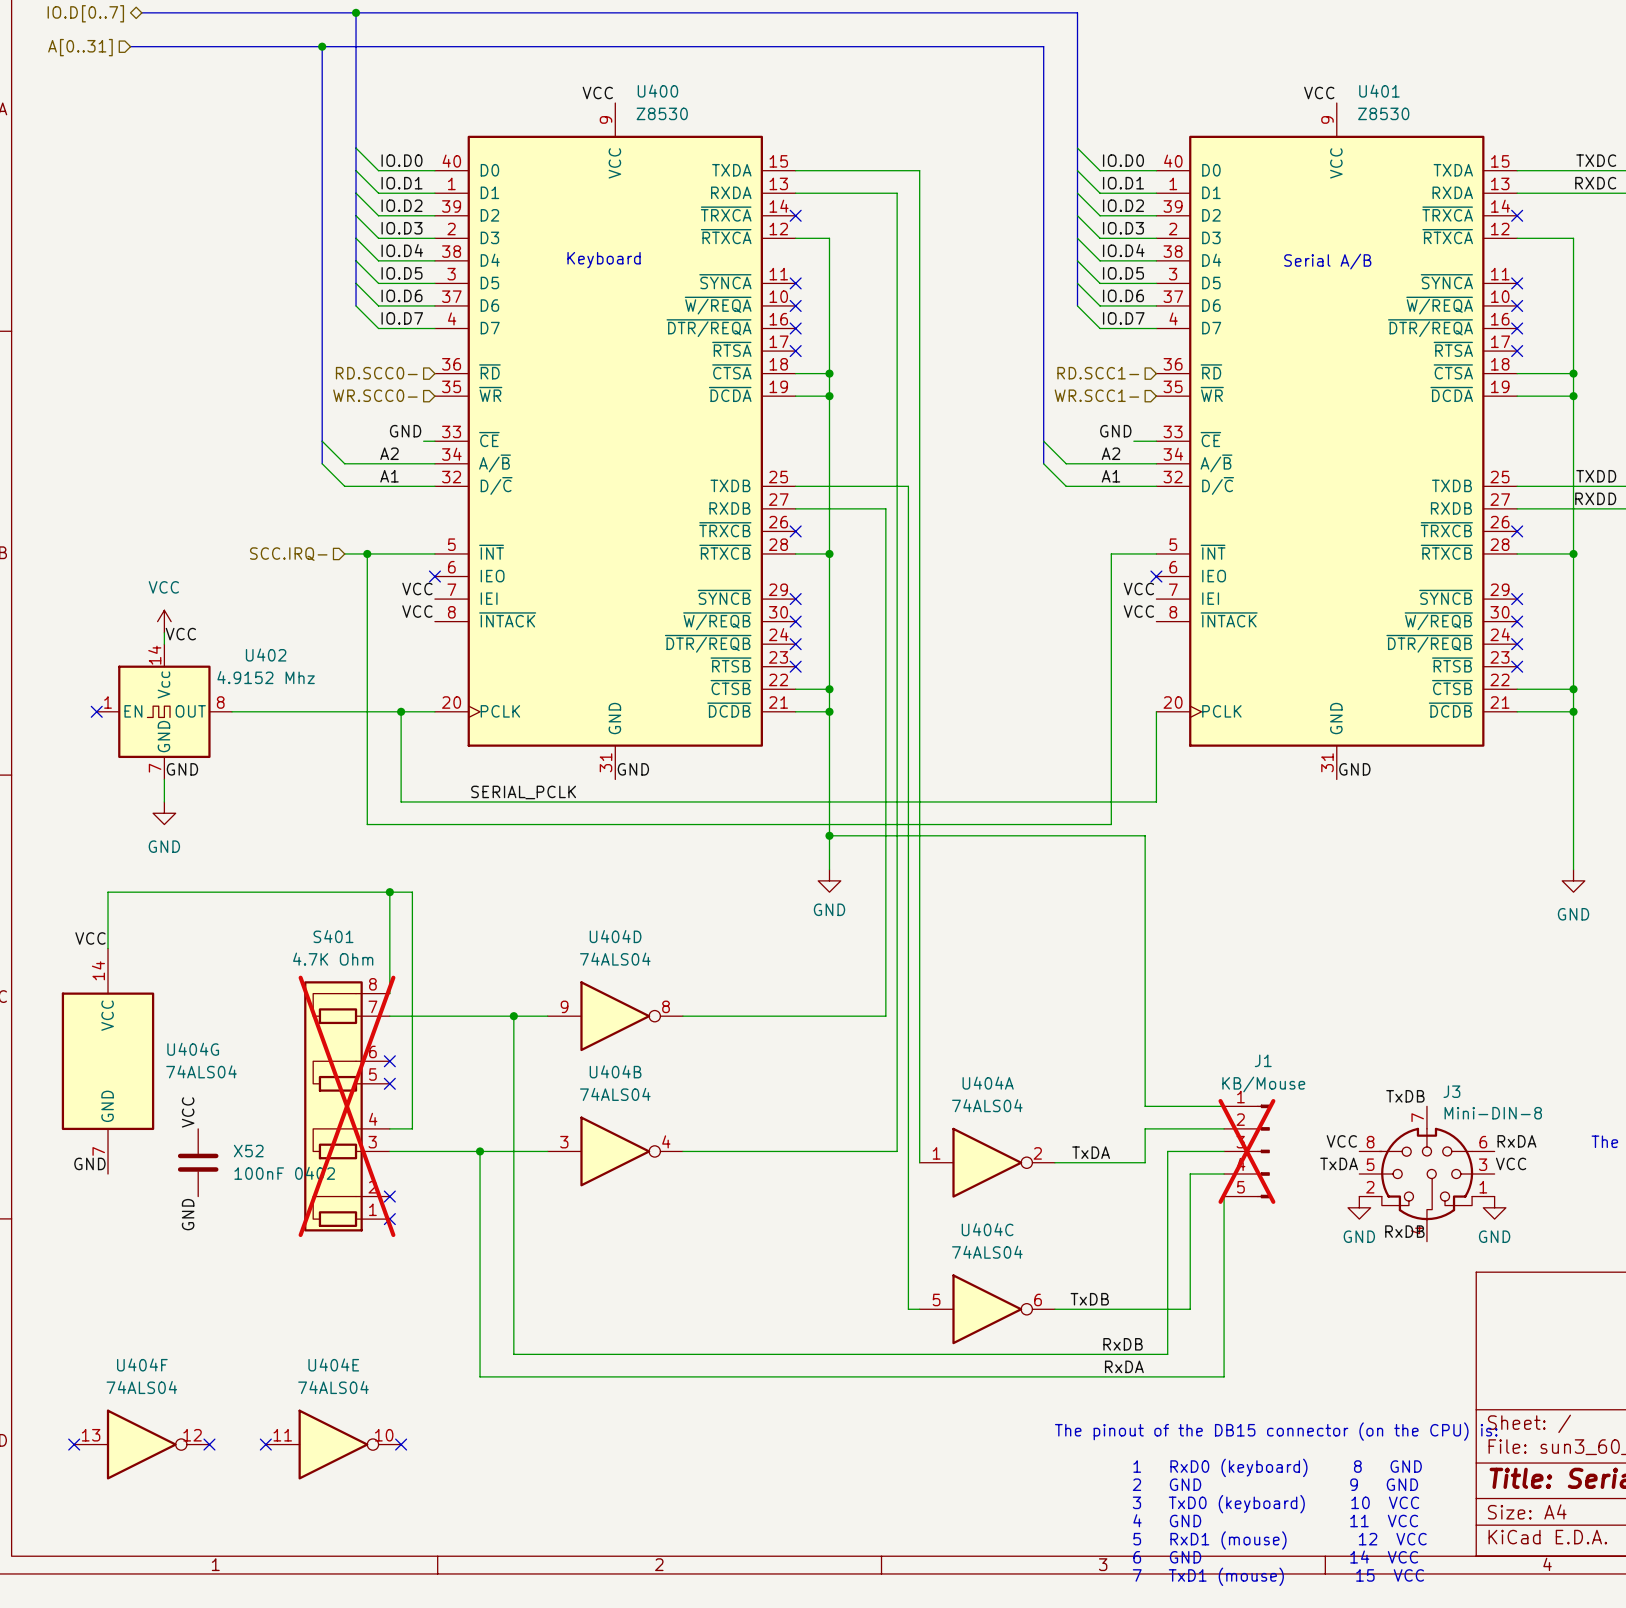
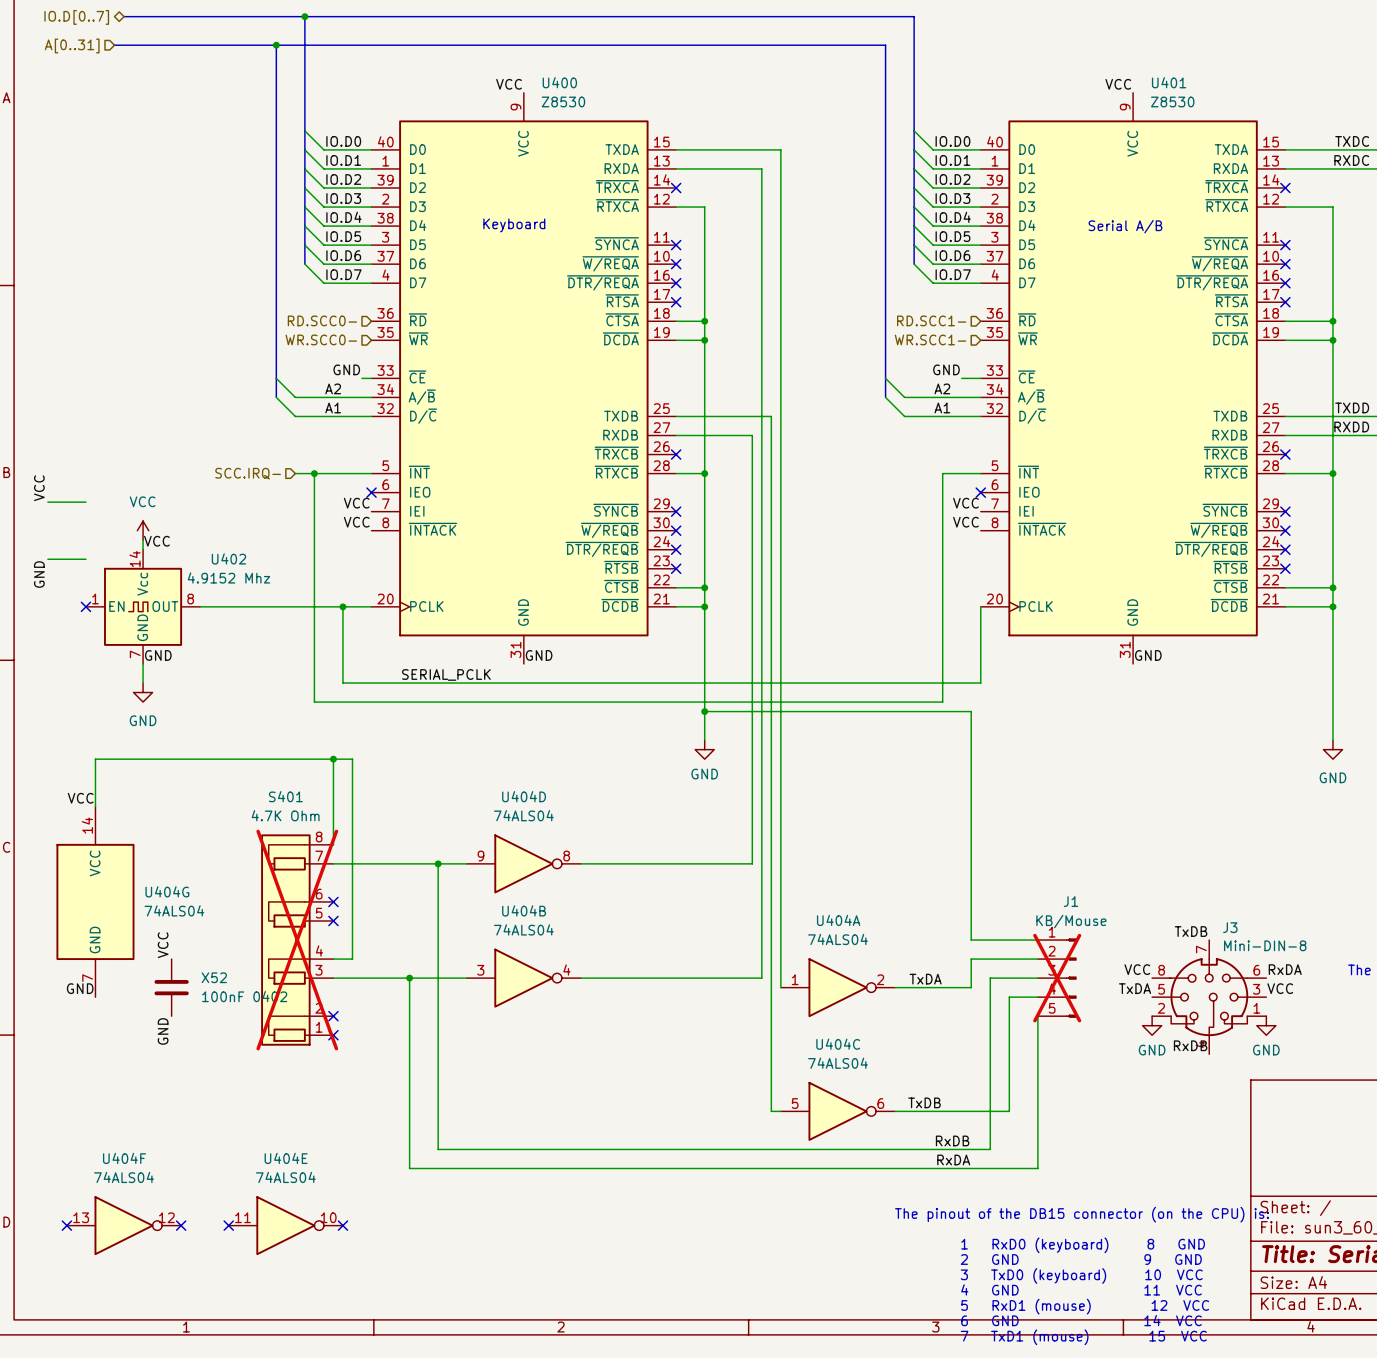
label: none -> VCC (39, 488)
wire: none -> (47, 502) (85, 502)
wire: none -> (47, 559) (85, 559)
label: none -> GND (39, 574)

